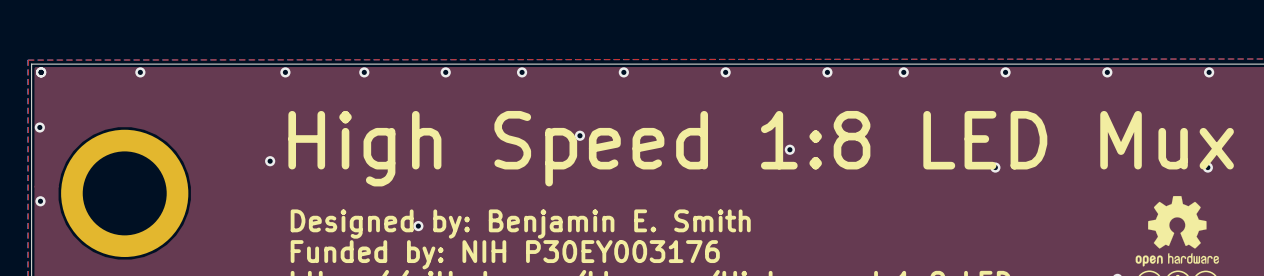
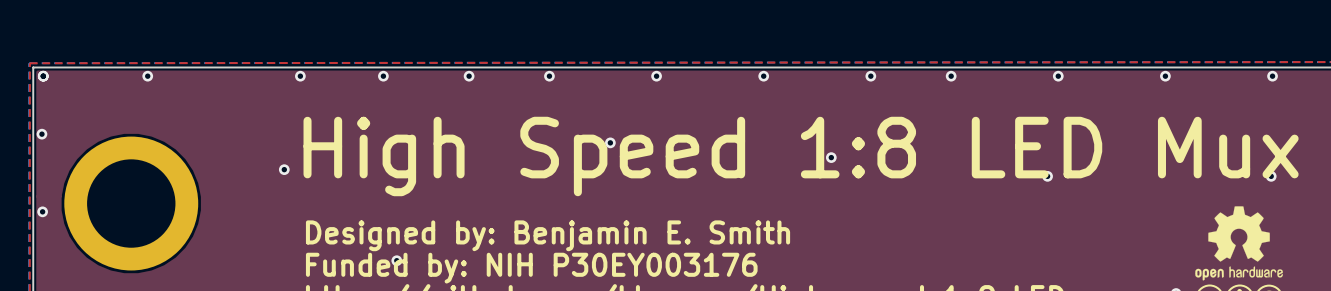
via position: (418, 226) -> (396, 260)

